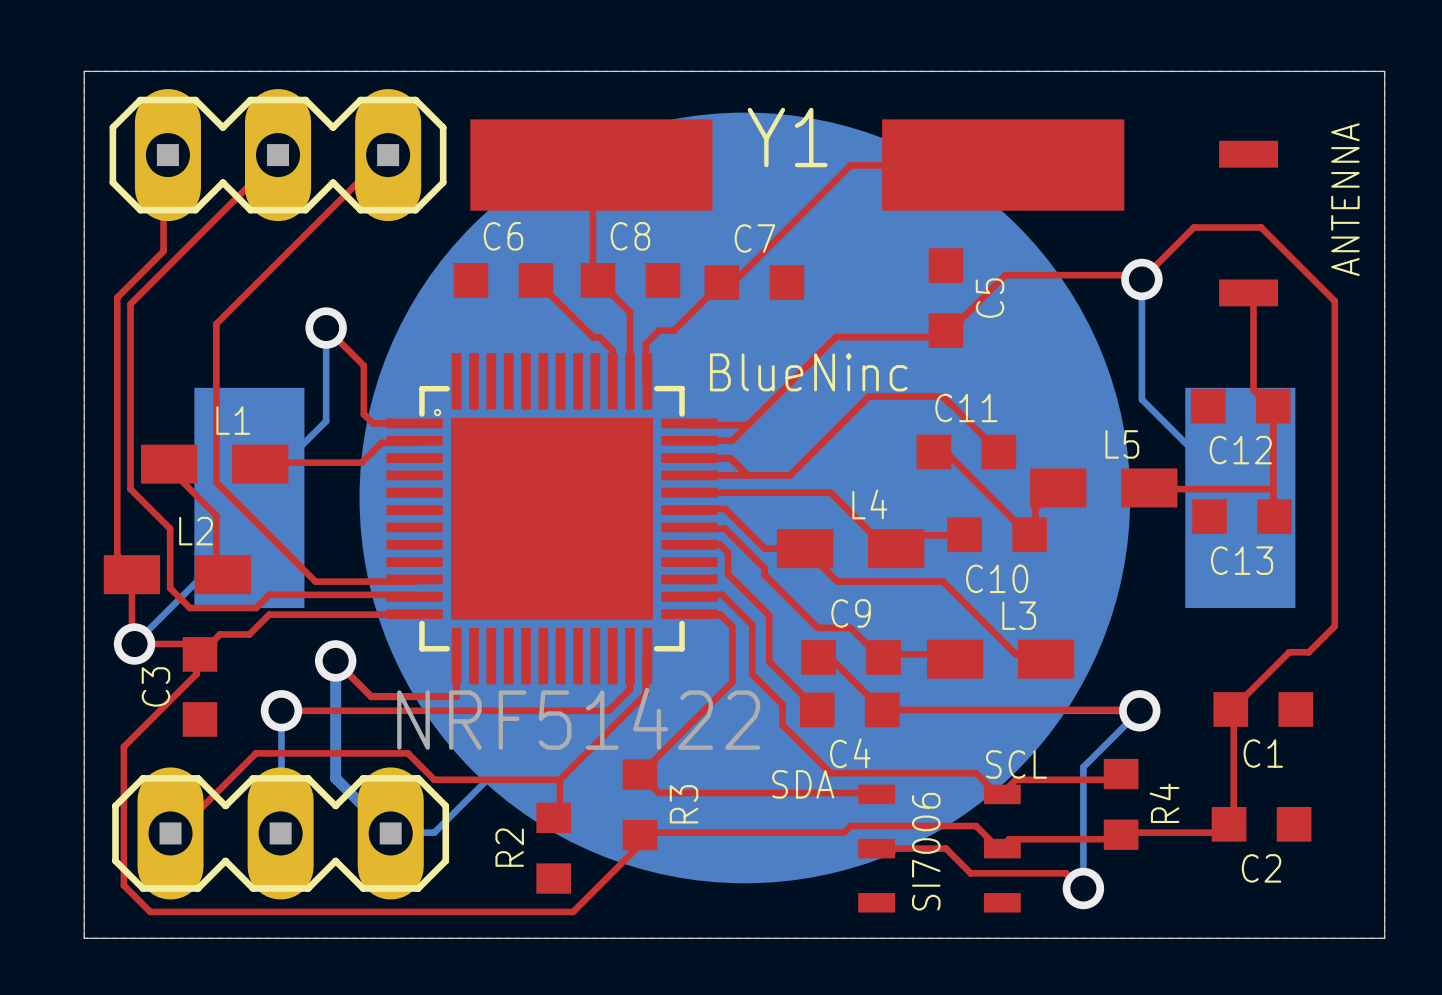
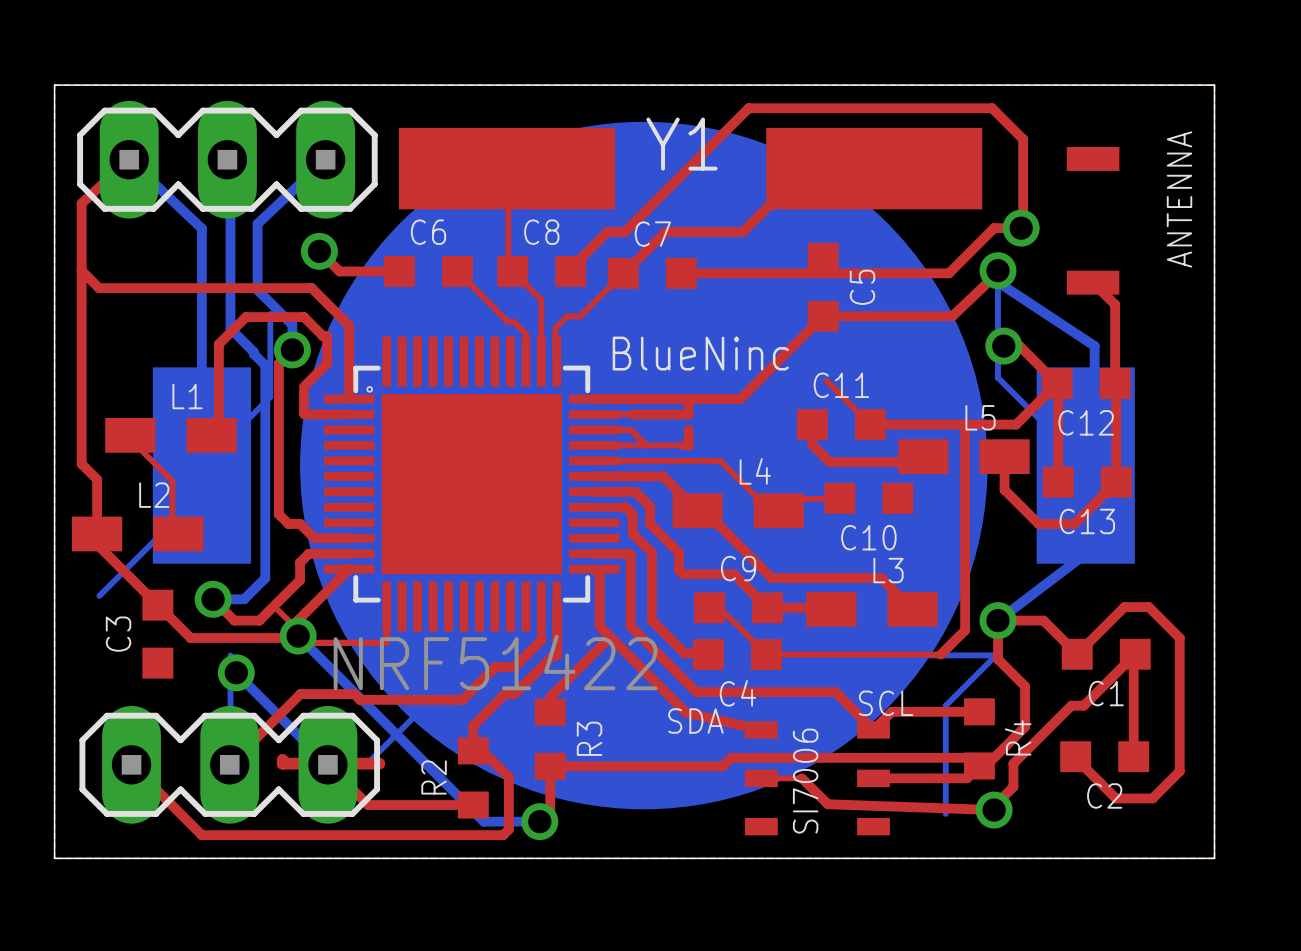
top track: (167, 155) (163, 158) (163, 251) (117, 297) (117, 555) (130, 568) (131, 574) (137, 575) -> (129, 159) (81, 203) (81, 464) (97, 479) (97, 533)
bottom track: none -> (129, 159) (201, 228) (201, 465)
top track: (278, 155) (130, 304) (130, 489) (170, 528) (170, 588) (189, 608) (256, 608) (269, 594) (414, 594) (414, 596) -> (213, 599) (234, 620) (259, 620) (300, 580) (300, 562) (308, 553) (349, 553)
bottom track: none -> (227, 159) (230, 162) (230, 328) (265, 365) (265, 578) (244, 599) (213, 599)
top track: (388, 155) (381, 158) (216, 323) (216, 482) (315, 581) (414, 581) (414, 579) -> (292, 349) (278, 363) (278, 514) (288, 523) (300, 523) (314, 538) (349, 538)
bottom track: none -> (325, 159) (257, 223) (257, 290) (292, 324) (292, 349)
top track: (1002, 165) (850, 165) (738, 277) (725, 277) (718, 284) -> (874, 168) (847, 195) (779, 195) (742, 232) (665, 232) (624, 273)
via: none -> (1021, 228)
top track: none -> (319, 251) (339, 271) (399, 271)
via: none -> (319, 251)
top track: none -> (81, 270) (99, 288) (311, 288) (349, 325) (349, 399)
top track: none -> (570, 271) (570, 268) (607, 232) (624, 232) (748, 108) (992, 108) (1023, 139) (1023, 226) (1021, 228) (994, 228) (948, 273) (681, 273)
top track: none -> (992, 278) (952, 316) (823, 316) (740, 399) (594, 399)
bottom track: none -> (992, 278) (1094, 346) (1094, 547) (997, 620)
top track: (1248, 292) (1253, 297) (1253, 390) (1266, 403) (1273, 406) (1274, 516) -> (1093, 282) (1115, 304) (1116, 482) (1074, 523) (1038, 523) (1004, 489) (1004, 456)
top track: (326, 328) (363, 365) (363, 409) -> none
via: (326, 328) -> none
top track: none -> (1003, 346) (1019, 346) (1058, 384) (1058, 482)
via: none -> (1003, 346)
via: none -> (292, 349)
top track: (949, 403) (942, 396) (868, 396) (789, 475) -> (688, 429) (688, 445) (684, 445)
top track: none -> (1057, 383) (1016, 424) (870, 424)
top track: (363, 414) (372, 423) (414, 423) -> (303, 390) (304, 414) (349, 414)
top track: (414, 440) (414, 442) (381, 442) (361, 462) (260, 464) -> (303, 386) (327, 363) (327, 336) (323, 336) (303, 317) (245, 317) (218, 344) (218, 428) (211, 435)
top track: (732, 440) (835, 337) (943, 337) (945, 330) (949, 337) (949, 330) (1005, 275) (1137, 275) (1141, 279) (1193, 227) (1261, 227) (1334, 301) (1334, 626) (1308, 652) (1289, 652) (1230, 709) (1233, 712) (1233, 819) (1227, 826) -> (632, 414) (688, 414) (688, 399)
top track: (933, 452) (936, 456) (949, 456) (1028, 535) (1035, 528) (1035, 508) (1058, 487) -> (812, 424) (812, 444) (829, 462) (917, 462)
top track: (1149, 487) (1273, 489) -> none
top track: (689, 510) (725, 508) (764, 548) (804, 548) -> none
top track: (689, 527) (725, 528) (764, 568) (764, 575) (817, 627) (850, 627) (876, 654) (883, 657) (883, 654) (949, 654) (955, 659) -> (594, 491) (635, 491) (650, 506) (650, 523) (679, 552) (679, 570) (682, 574) (733, 574) (767, 607) (829, 607) (831, 609)
top track: (720, 544) (727, 552) (727, 574) (769, 615) (769, 661) (815, 708) -> (621, 507) (625, 507) (632, 514) (632, 533) (651, 552) (651, 620) (684, 653) (708, 654)
top track: (805, 548) (837, 581) (943, 581) (1015, 654) (1042, 654) (1046, 659) -> (594, 476) (663, 476) (697, 510) (704, 510) (771, 578) (881, 578) (912, 609)
top track: (131, 586) (131, 641) (134, 644) (189, 644) -> (97, 544) (148, 595)
top track: (689, 596) (692, 594) (722, 594) (752, 624) (752, 674) (782, 704) (782, 725) (830, 773) (976, 773) (995, 793) (1002, 794) (1015, 779) (1114, 779) (1121, 774) -> (594, 553) (630, 554) (630, 626) (696, 692) (835, 692) (873, 730) (891, 711) (979, 711)
top track: none -> (343, 569) (349, 569) (298, 620) (298, 636) (296, 638) (190, 638) (157, 605)
top track: (414, 614) (269, 614) (249, 634) (219, 634) (200, 654) (196, 660) (196, 674) (123, 746) (123, 885) (150, 911) (573, 911) (645, 839) (639, 835) (645, 832) (843, 832) (850, 826) (976, 826) (995, 845) (1002, 848) (1009, 839) (1114, 839) (1121, 832) (1220, 832) -> none
top track: (689, 614) (685, 614) (720, 614) (732, 626) (732, 682) (639, 774) -> (610, 637) (550, 697) (550, 712)
via: (134, 644) -> none
via: none -> (213, 599)
top track: (647, 656) (645, 693) (559, 779) -> none
bottom track: (335, 660) (335, 778) -> (236, 673) (278, 715)
via position: (335, 660) -> (298, 636)
bottom track: none -> (298, 636) (483, 821) (539, 821)
top track: (630, 689) (608, 710) (281, 710) -> (541, 636) (541, 640) (514, 666) (495, 666) (462, 699) (360, 699) (354, 694) (300, 694) (229, 764) (229, 762)
top track: (1077, 709) (1139, 710) -> (940, 654) (965, 630) (965, 426) (963, 424)
via position: (281, 710) -> (236, 672)
via position: (1139, 710) -> (997, 620)
top track: none -> (1133, 655) (1133, 756)
top track: (639, 774) (658, 793) (876, 794) -> (594, 569) (599, 574) (599, 626) (685, 712) (761, 730)
top track: (559, 779) (434, 779) (407, 753) (256, 753) (176, 832) (170, 833) -> (557, 607) (557, 655) (553, 655) (514, 694) (505, 694) (473, 725) (473, 750) (482, 750) (508, 777) (508, 829) (503, 835) (201, 835) (131, 764)
top track: (559, 779) (559, 812) (553, 817) -> none
top track: none -> (1077, 755) (1077, 759) (1115, 798) (1152, 798) (1179, 771) (1179, 638) (1148, 607) (1124, 607) (1077, 654) (1043, 620) (997, 620) (997, 659) (1025, 686) (1025, 726) (986, 765) (979, 765)
top track: none -> (282, 759) (282, 763) (379, 763)
top track: none -> (327, 764) (368, 805) (473, 805)
top track: none -> (979, 765) (967, 778) (873, 778)
top track: none -> (979, 765) (971, 757) (731, 757) (722, 766) (550, 766) (550, 820) (539, 821)
top track: (922, 848) (945, 848) (970, 873) (1066, 873) (1083, 888) -> (801, 778) (827, 804) (994, 810) (996, 804) (1013, 786) (1013, 763) (1071, 705) (1083, 705) (1135, 654)
via position: (1083, 888) -> (994, 810)
via: none -> (539, 821)

